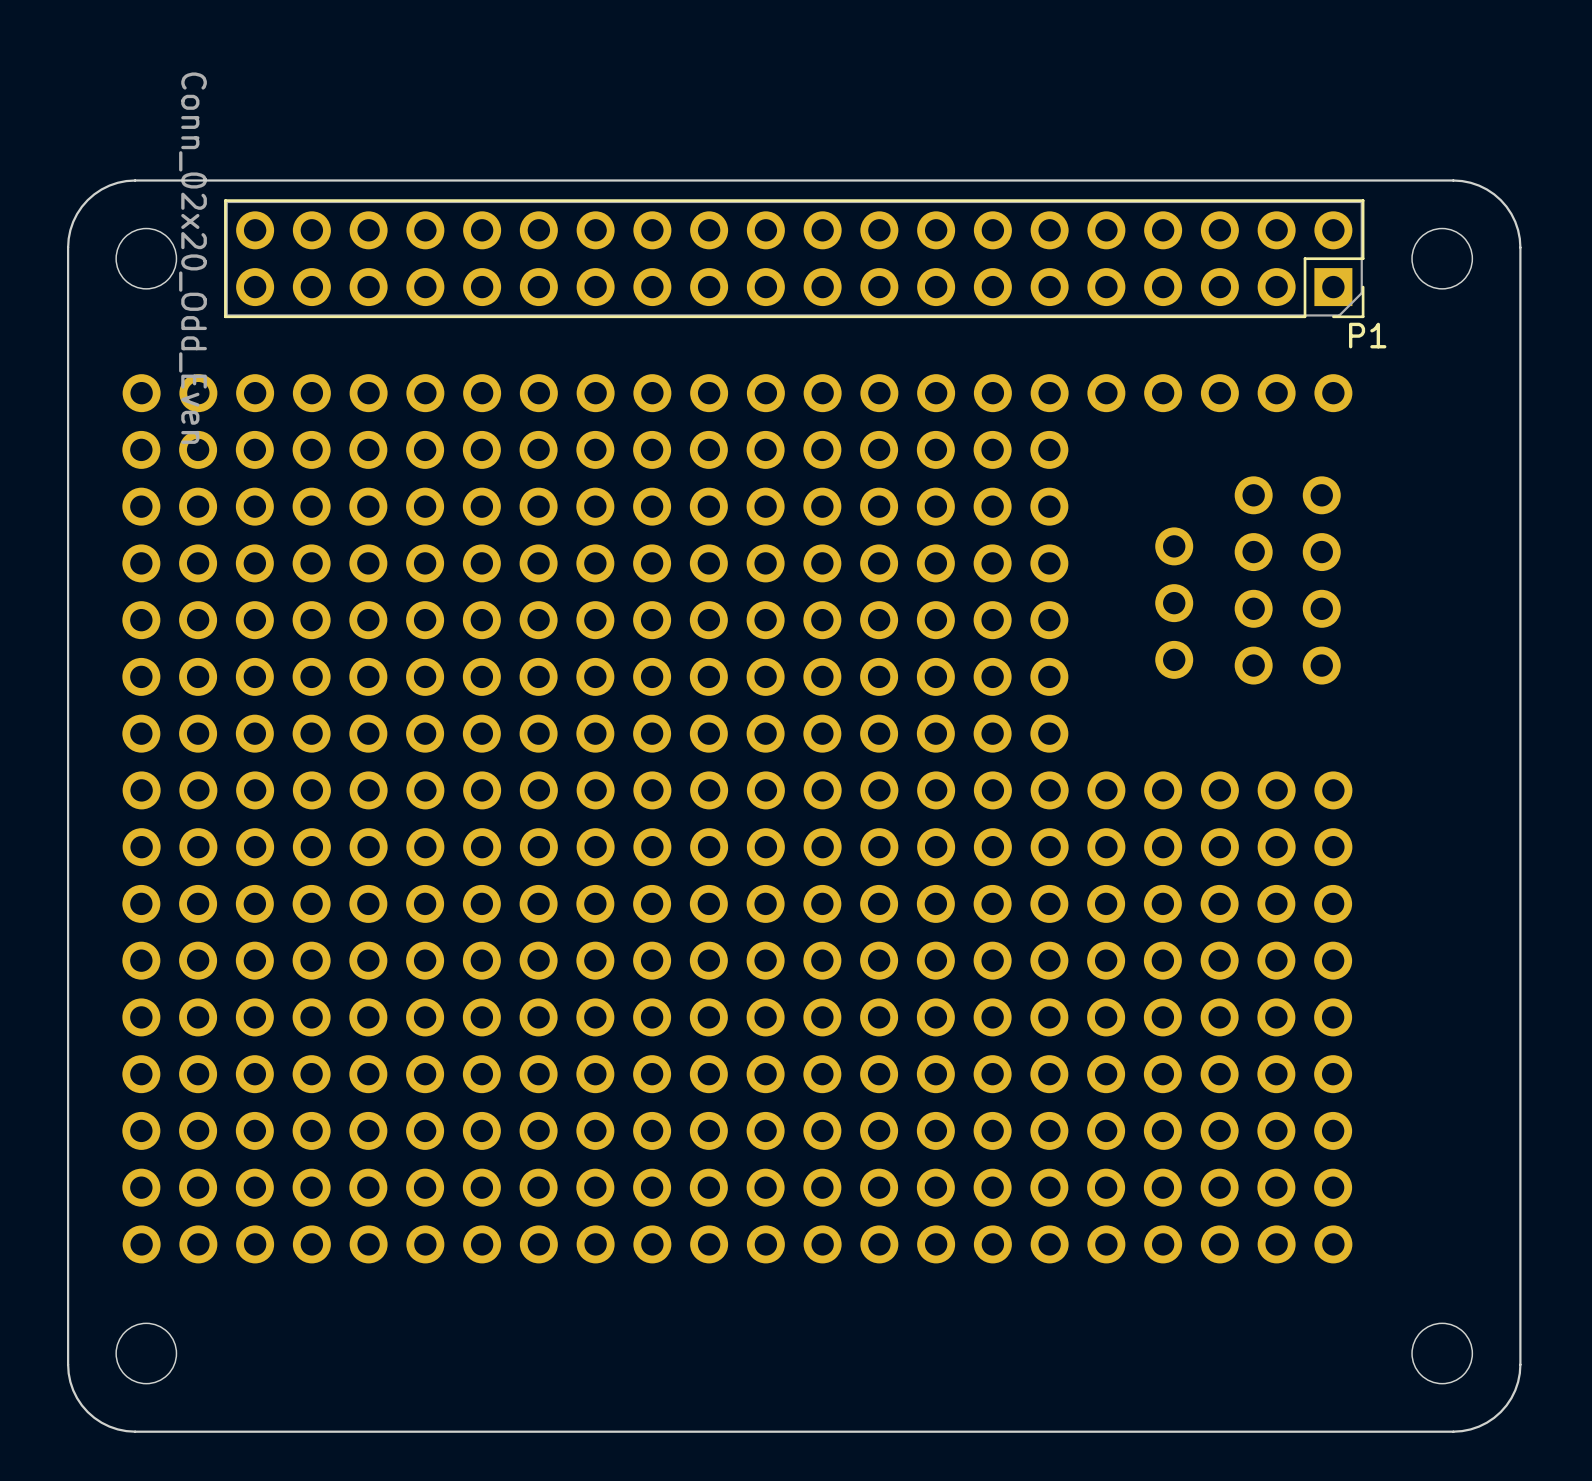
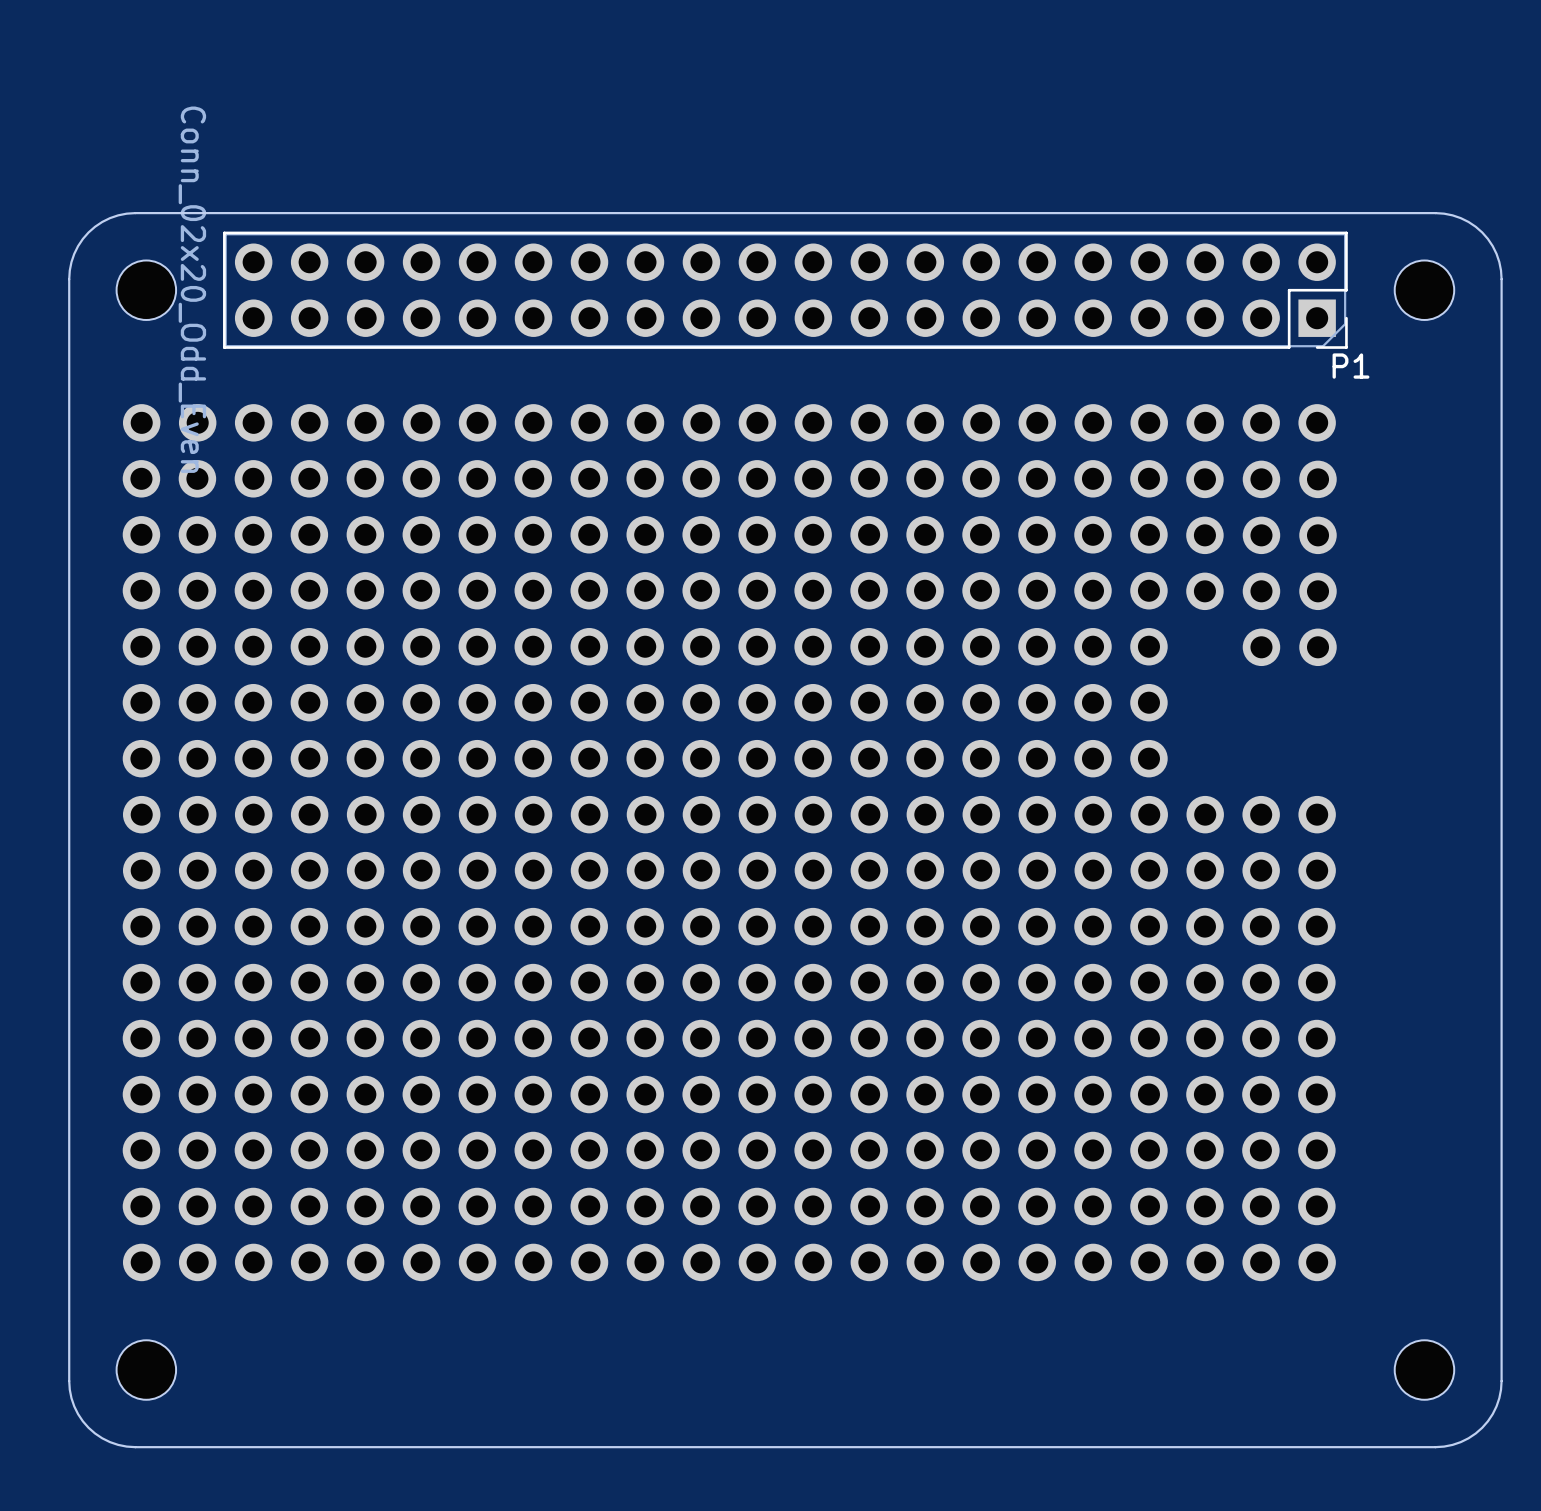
part: none -> (1261, 563)
part: none -> (1318, 563)
part: (1253, 580) -> none
part: (1321, 580) -> none
part: none -> (645, 618)
part position: (1174, 603) -> (1204, 535)

